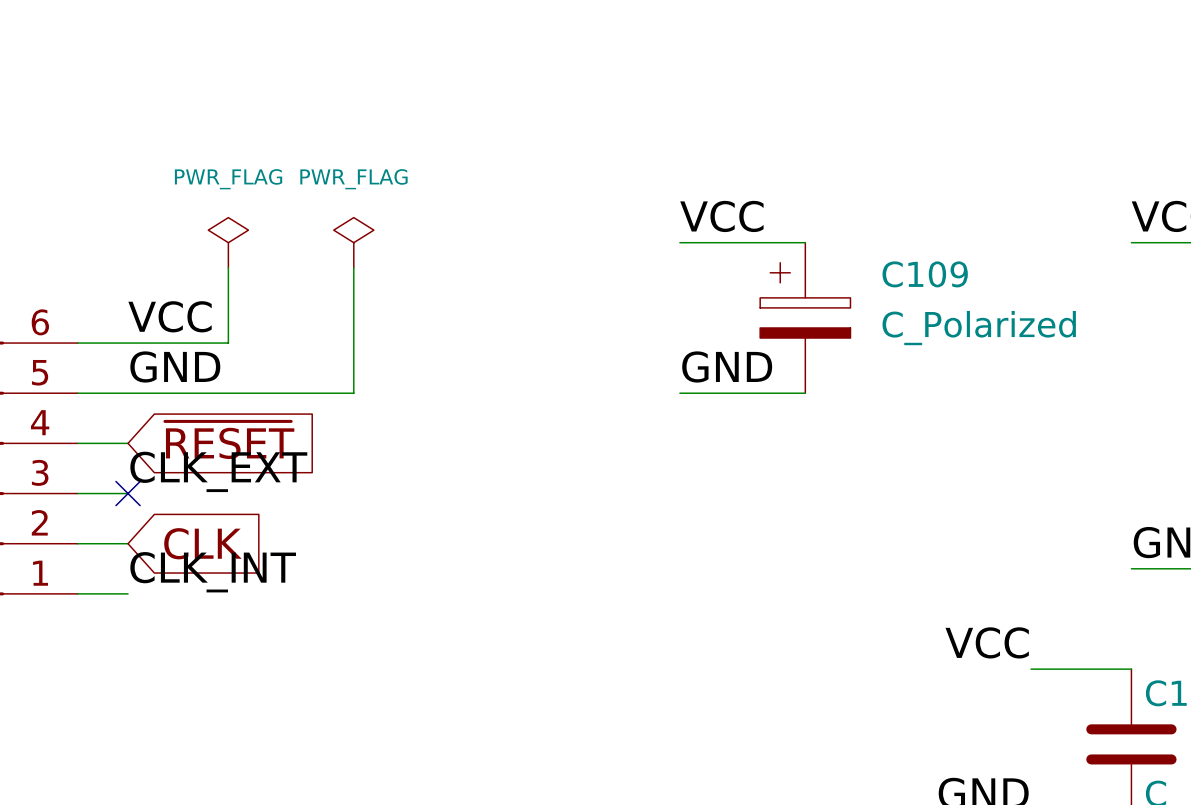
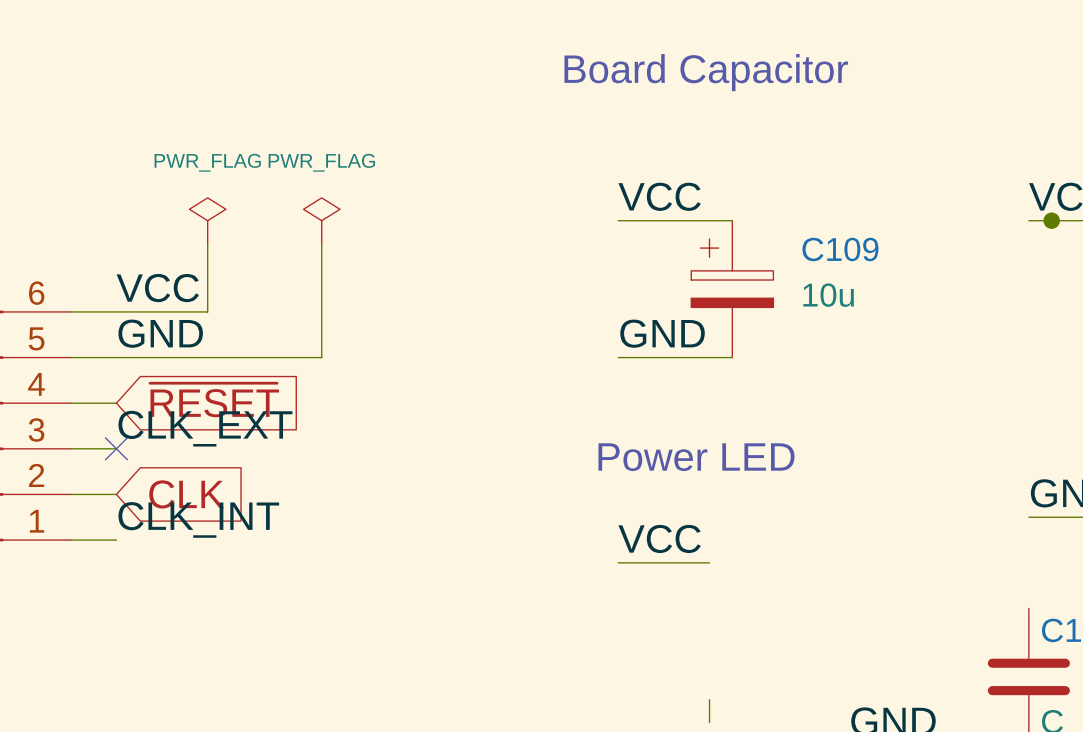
text: none -> Board Capacitor (706, 72)
junction: none -> (1051, 220)
C109 value: C_Polarized (979, 328) -> 10u (828, 295)
text: none -> Power LED (696, 457)
label position: VCC (987, 642) -> VCC (659, 538)
wire: (1031, 669) (1131, 669) -> (618, 562) (709, 562)
wire: none -> (709, 699) (709, 722)

